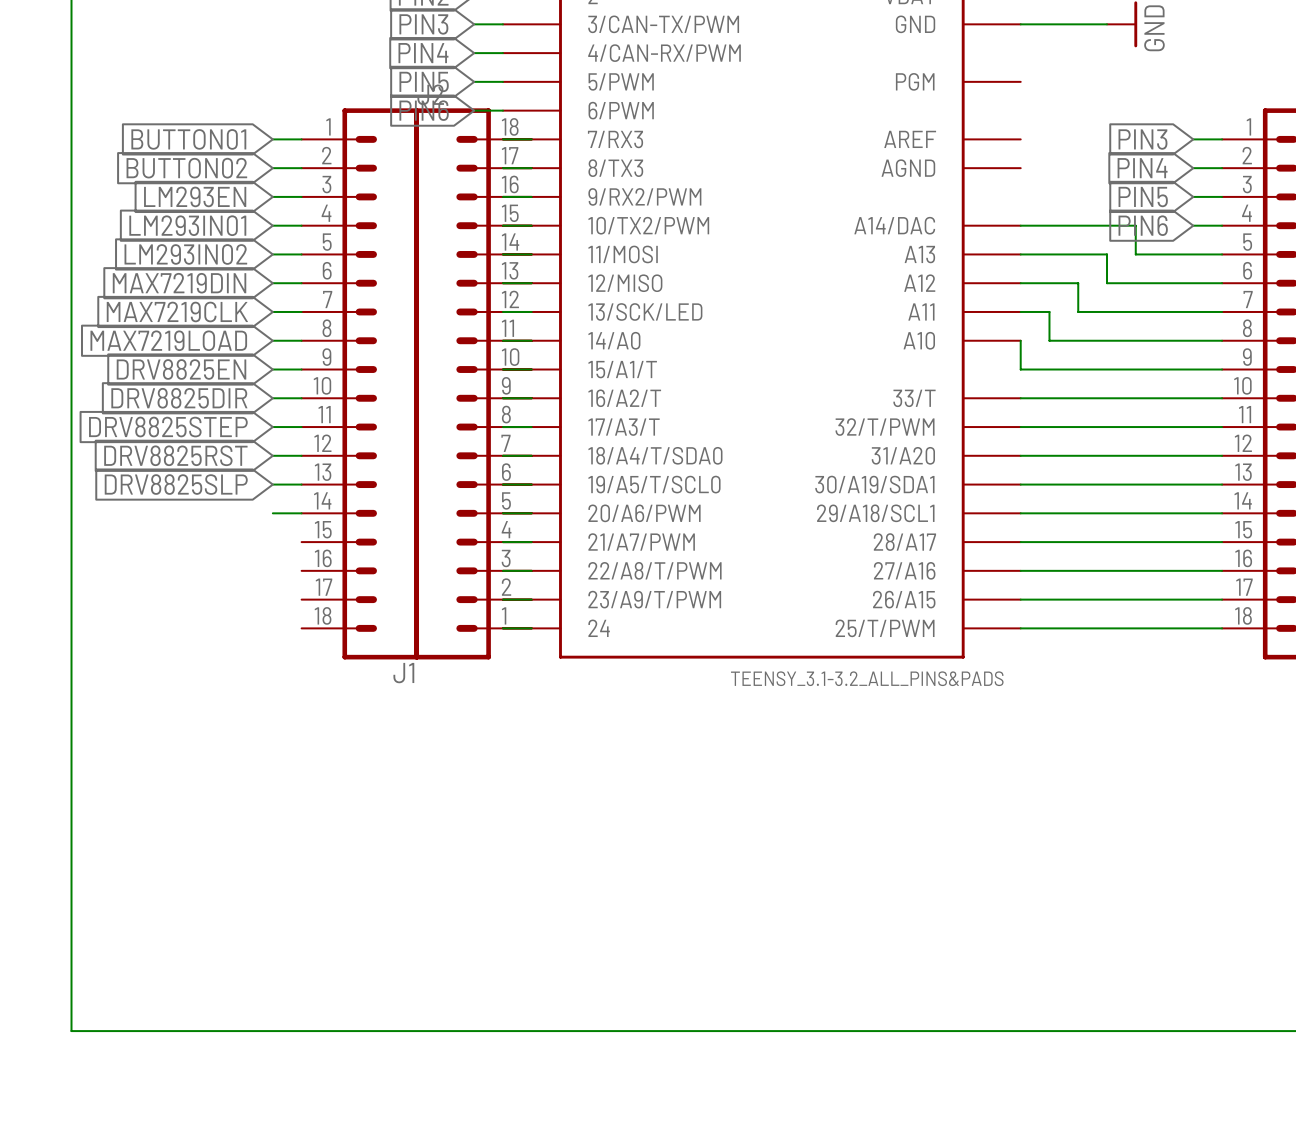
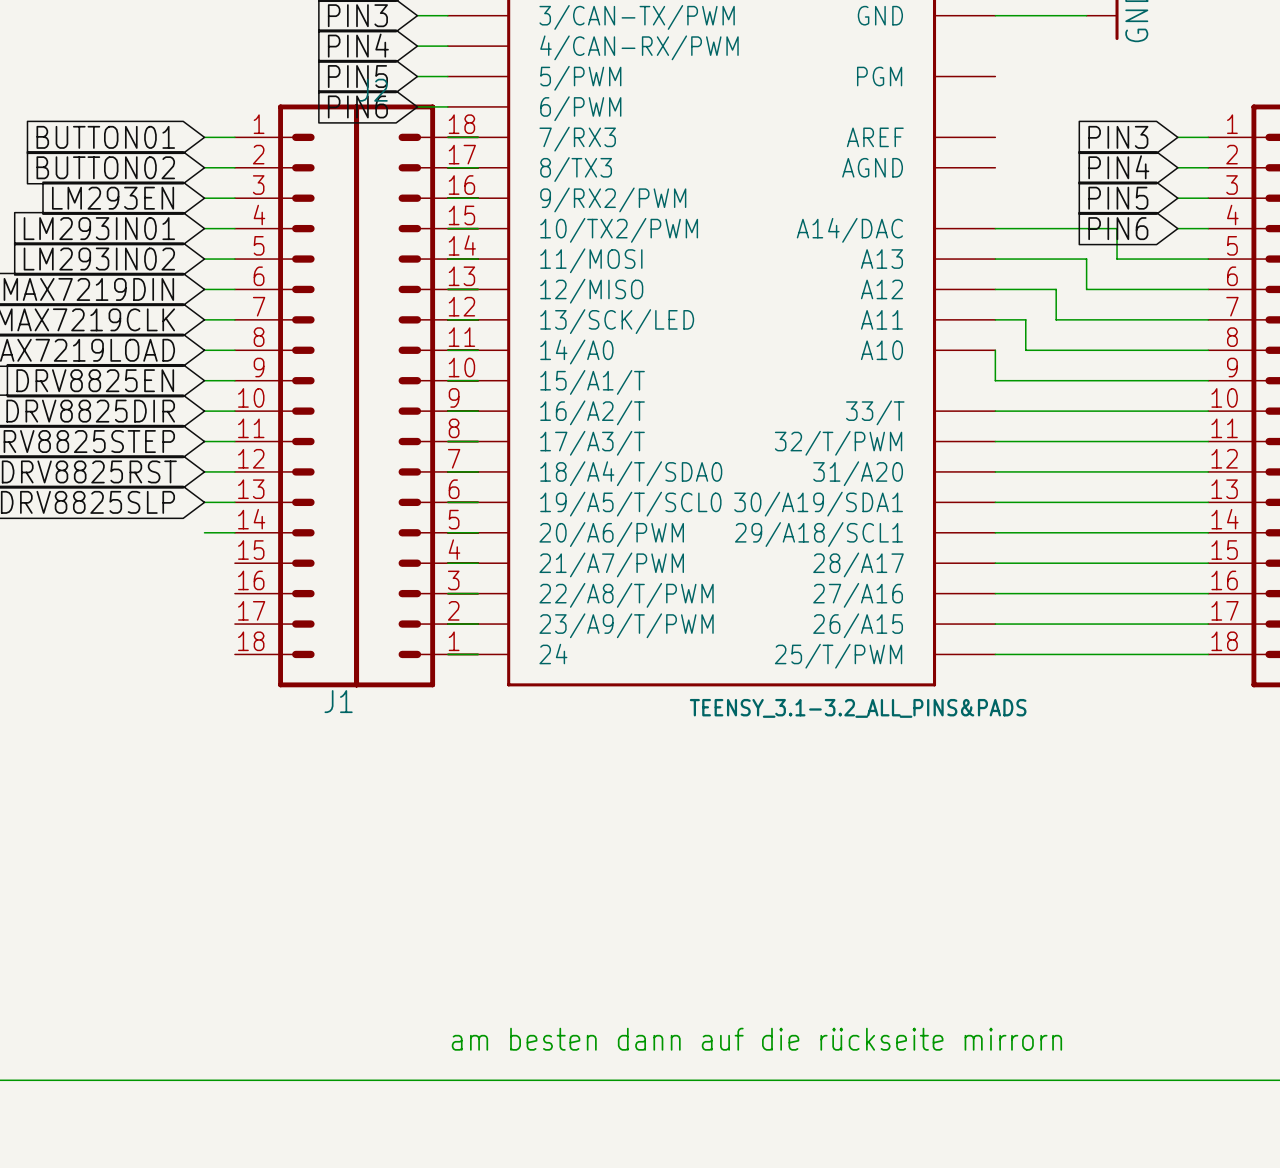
text: none -> am besten dann auf die rückseite mirrorn (756, 1039)

